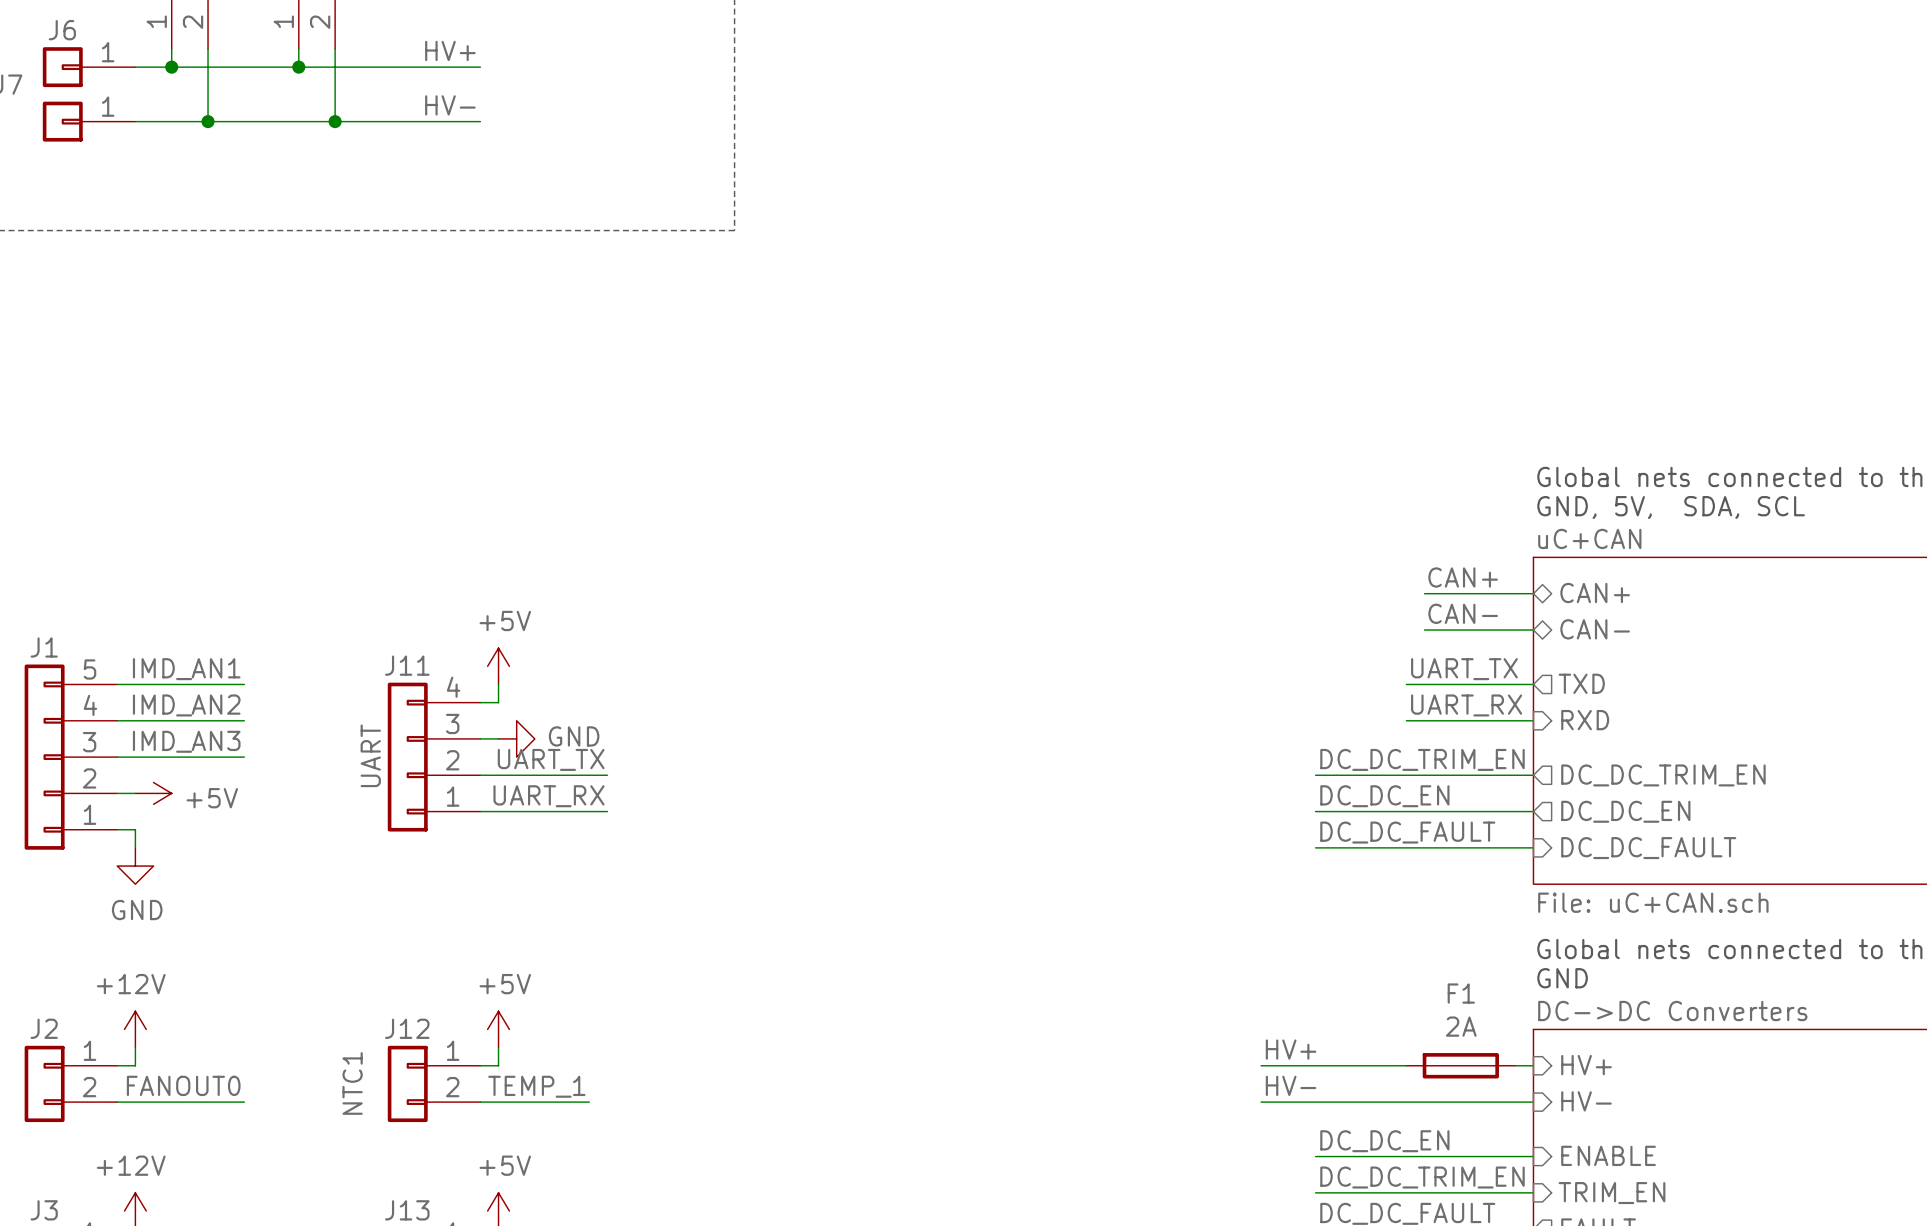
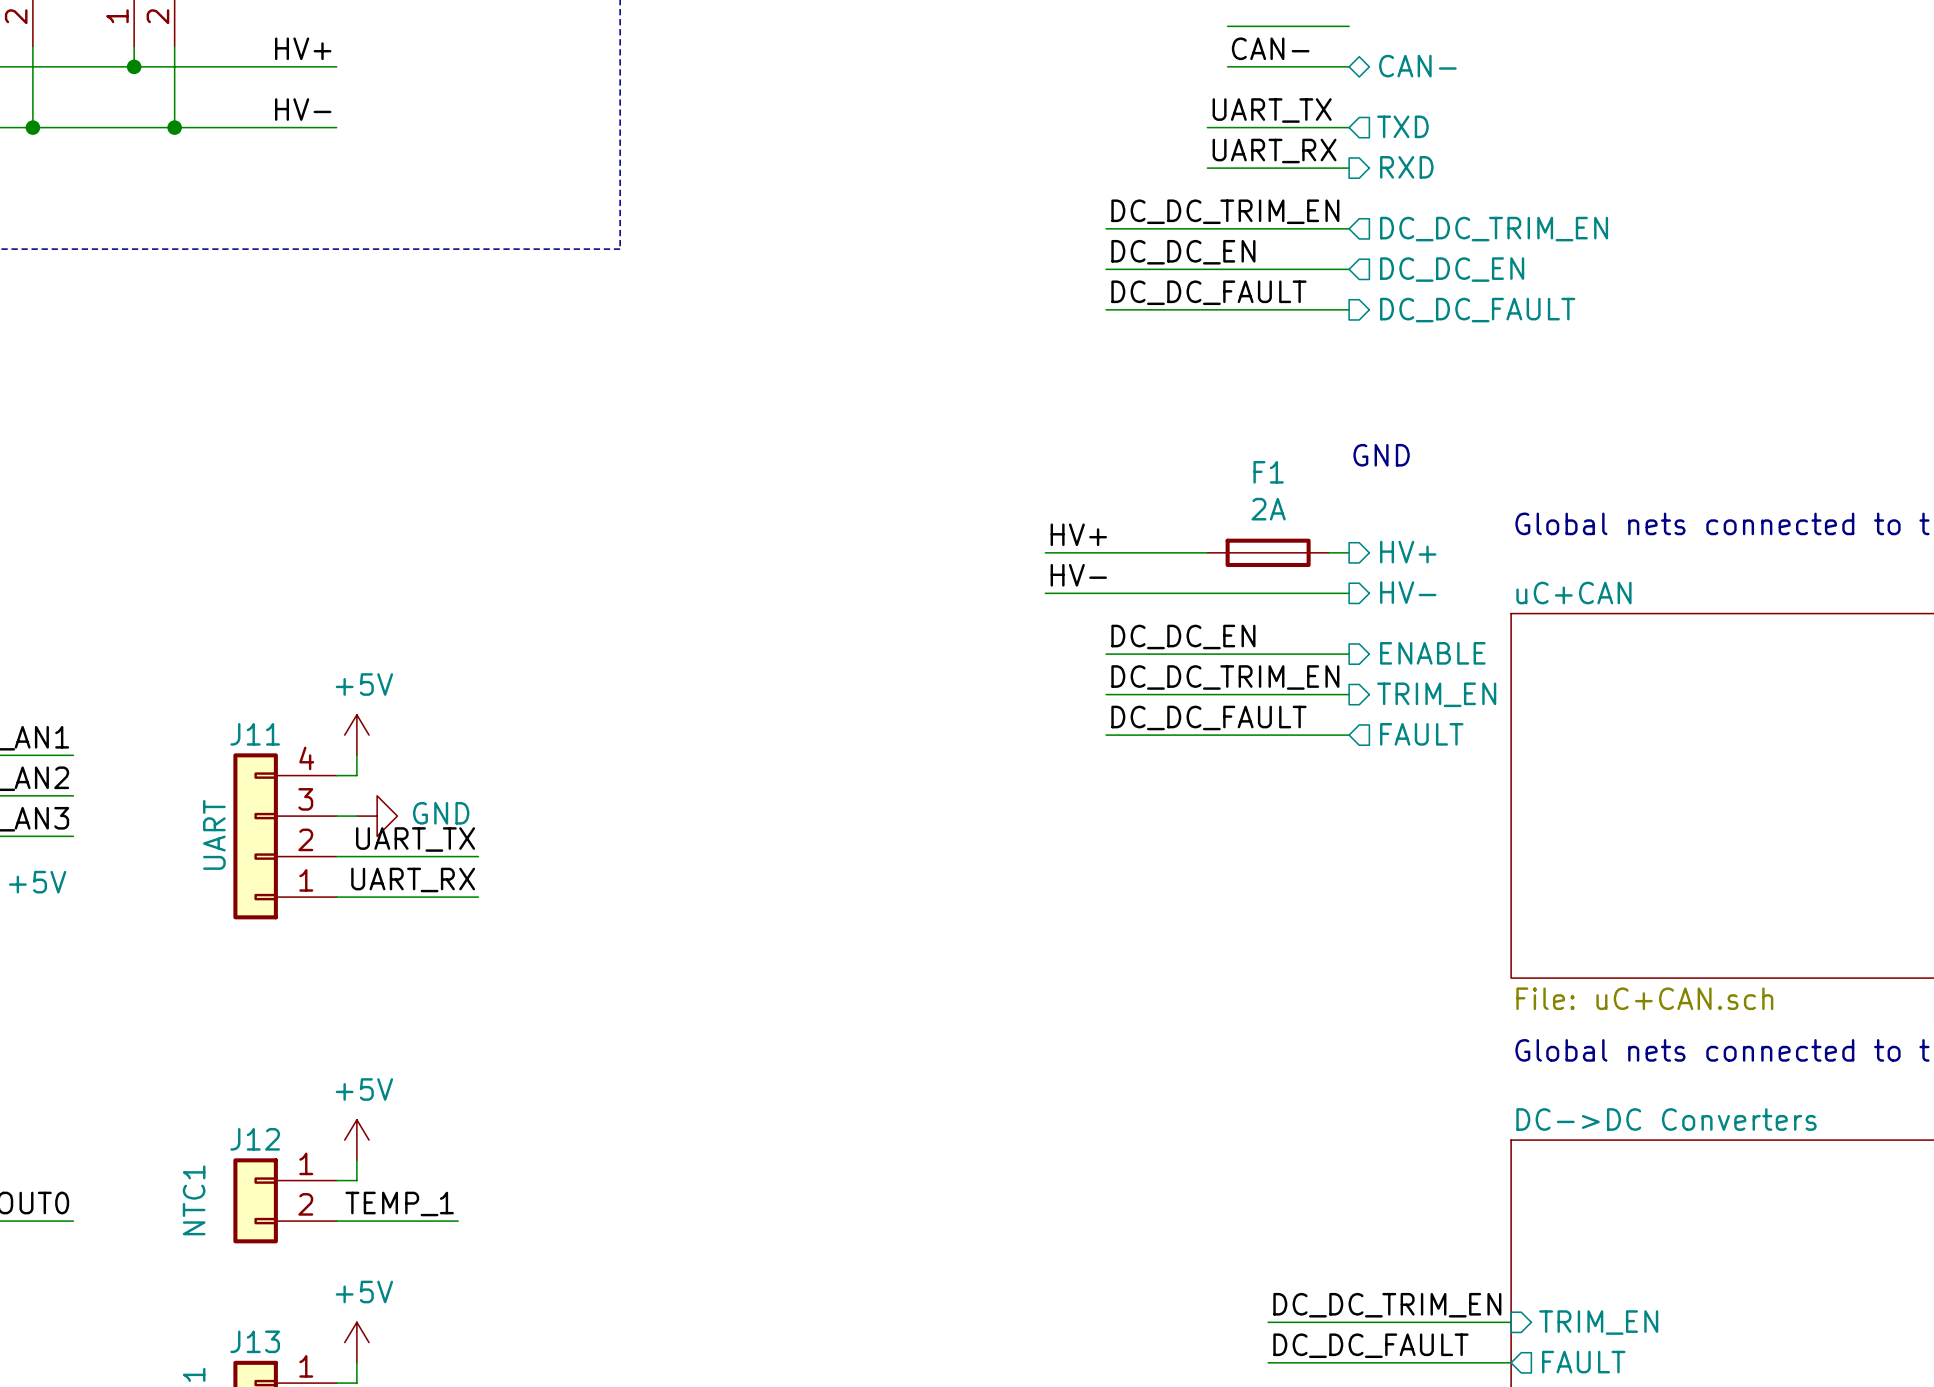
wire: none -> (1227, 26) (1349, 26)
label: none -> CAN- (1270, 48)
sheet pin: none -> CAN- (1417, 66)
wire: none -> (1227, 66) (1349, 66)
label: none -> UART_TX (1272, 110)
sheet pin: none -> TXD (1402, 126)
wire: none -> (1207, 127) (1349, 127)
label: none -> UART_RX (1274, 150)
wire: none -> (1207, 168) (1349, 168)
sheet pin: none -> RXD (1406, 167)
label: none -> DC_DC_TRIM_EN (1225, 211)
wire: none -> (1106, 228) (1349, 228)
sheet pin: none -> DC_DC_TRIM_EN (1494, 229)
label: none -> DC_DC_EN (1183, 252)
wire: none -> (1106, 269) (1349, 269)
sheet pin: none -> DC_DC_EN (1452, 269)
label: none -> DC_DC_FAULT (1208, 292)
wire: none -> (1106, 309) (1349, 309)
sheet pin: none -> DC_DC_FAULT (1477, 310)
text: none -> GND (1381, 455)
label: none -> HV+ (1078, 534)
wire: none -> (1045, 552) (1207, 552)
wire: none -> (1328, 552) (1349, 552)
sheet pin: none -> HV+ (1408, 552)
text: GND, 5V, SDA, SCL (1671, 507) -> none
label: none -> HV- (1078, 575)
sheet pin: none -> HV- (1408, 592)
wire: none -> (1045, 593) (1349, 593)
label: CAN+ (1463, 577) -> none
wire: (1424, 593) (1533, 593) -> none
sheet pin: none -> ENABLE (1432, 653)
sheet pin: CAN+ (1595, 593) -> none
label: CAN- (1463, 613) -> none
sheet pin: CAN- (1595, 629) -> none
wire: (1424, 630) (1533, 630) -> none
sheet pin: none -> TRIM_EN (1436, 694)
sheet pin: none -> FAULT (1421, 734)
label: UART_TX (1464, 669) -> none
sheet pin: TXD (1581, 683) -> none
wire: (1406, 684) (1533, 684) -> none
label: UART_RX (1466, 705) -> none
wire: (1406, 720) (1533, 720) -> none
sheet pin: RXD (1585, 720) -> none
label position: DC_DC_TRIM_EN (1422, 759) -> DC_DC_TRIM_EN (1225, 677)
wire: (1315, 775) (1533, 775) -> (1106, 654) (1349, 654)
sheet pin: DC_DC_TRIM_EN (1663, 775) -> none
label position: DC_DC_EN (1384, 796) -> DC_DC_EN (1183, 636)
wire: (1315, 811) (1533, 811) -> (1106, 694) (1349, 694)
sheet pin: DC_DC_EN (1625, 811) -> none
label position: DC_DC_FAULT (1407, 832) -> DC_DC_FAULT (1208, 717)
wire: (1315, 847) (1533, 847) -> (1106, 735) (1349, 735)
sheet pin: DC_DC_FAULT (1648, 848) -> none
text: GND (1562, 978) -> none
label: HV+ (1291, 1049) -> none
wire: (1261, 1065) (1406, 1065) -> none
F1 position: (1460, 1065) -> (1268, 552)
wire: (1515, 1065) (1533, 1065) -> none
sheet pin: HV+ (1586, 1065) -> none
label: HV- (1291, 1085) -> none
sheet pin: HV- (1586, 1101) -> none
wire: (1261, 1102) (1533, 1102) -> none
label: DC_DC_EN (1384, 1141) -> none
sheet pin: ENABLE (1608, 1155) -> none
wire: (1315, 1156) (1533, 1156) -> none

